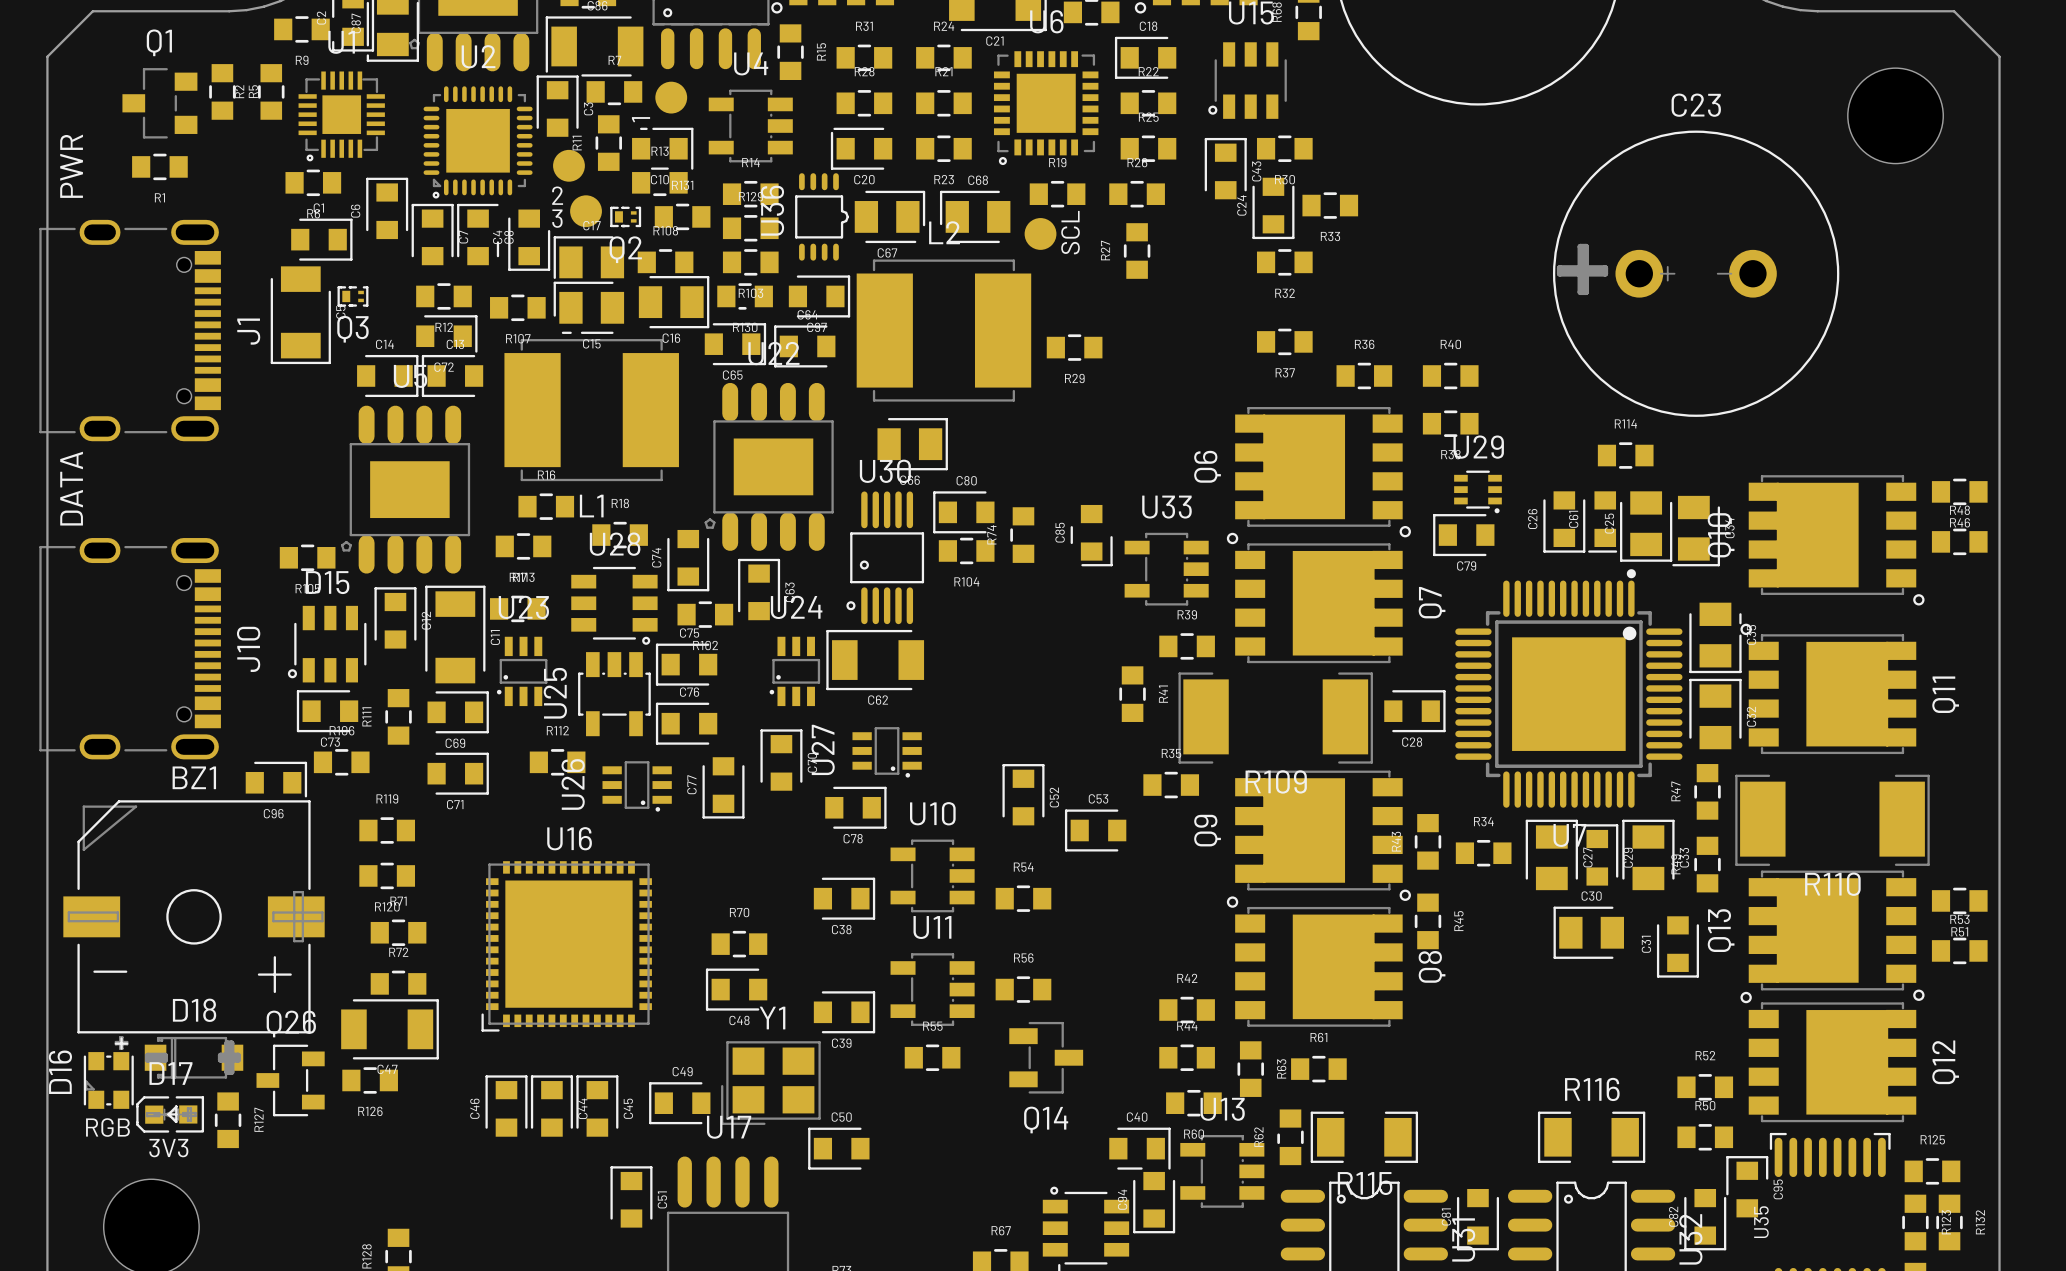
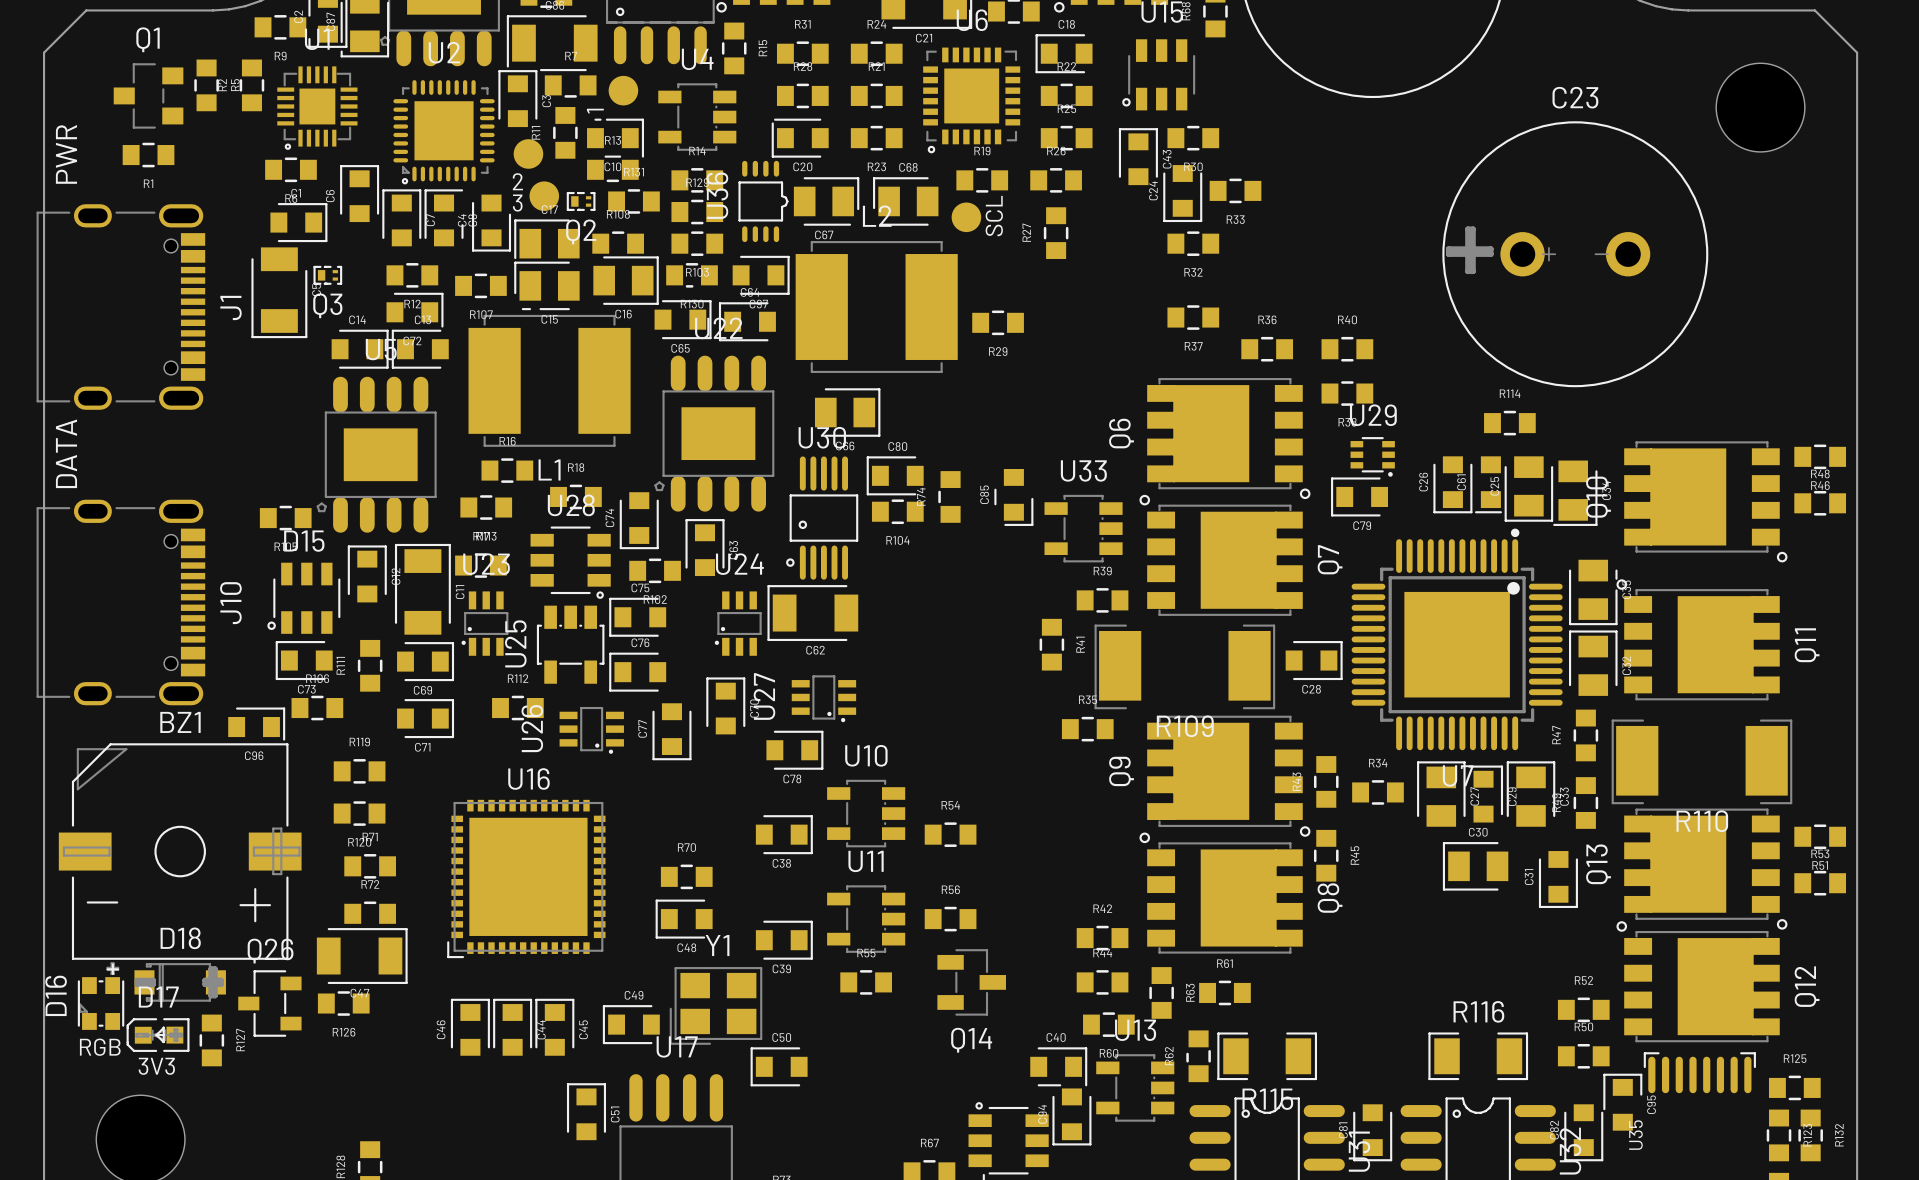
C52: (1023, 794) -> none
C53: (1095, 830) -> none

